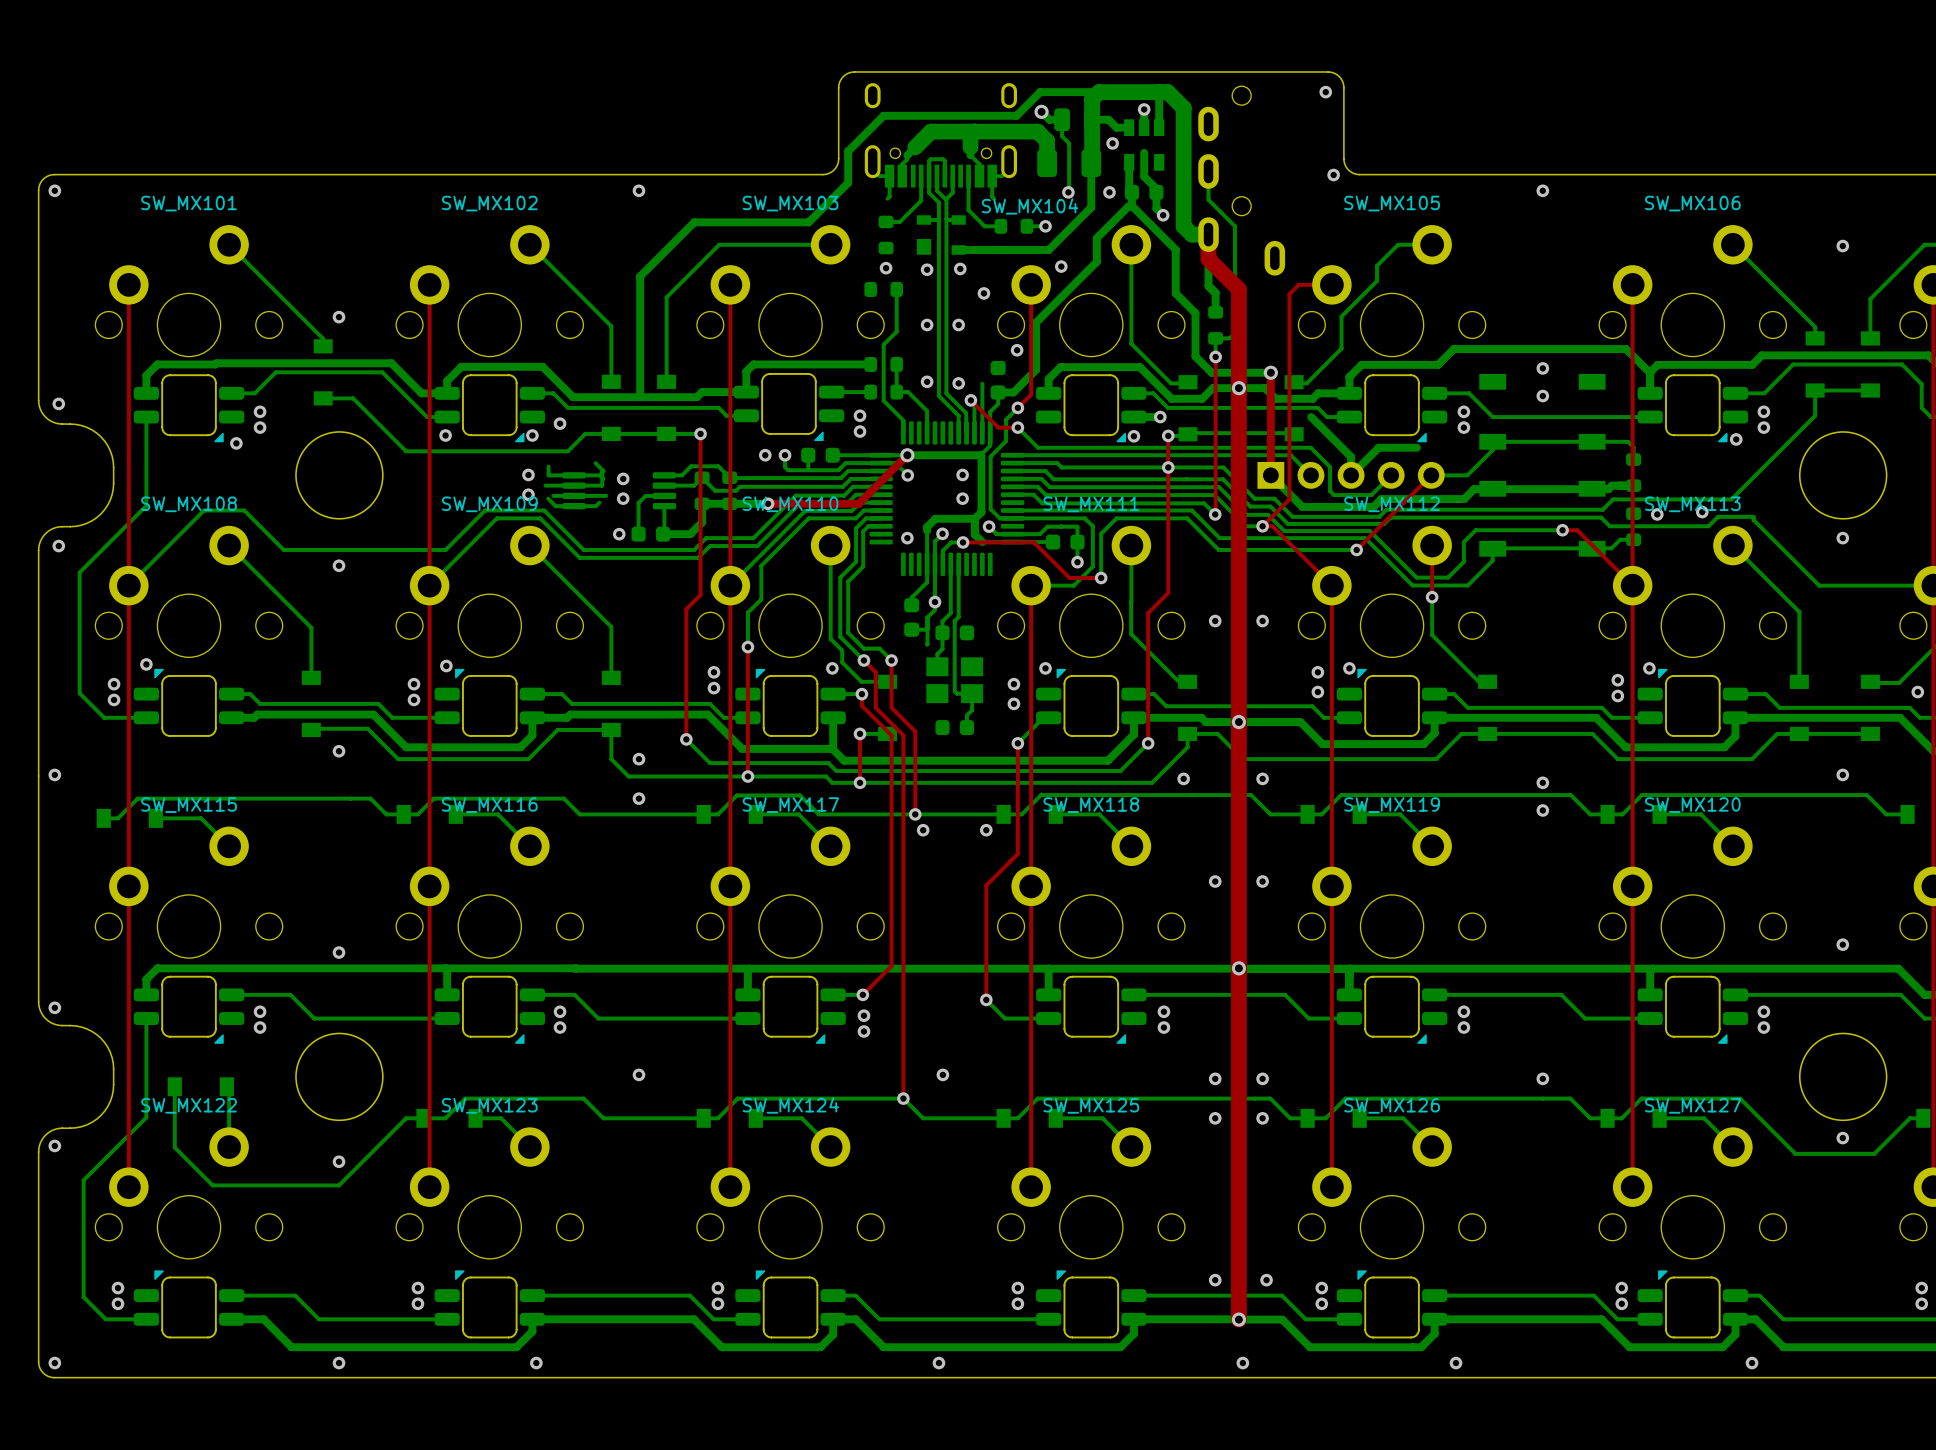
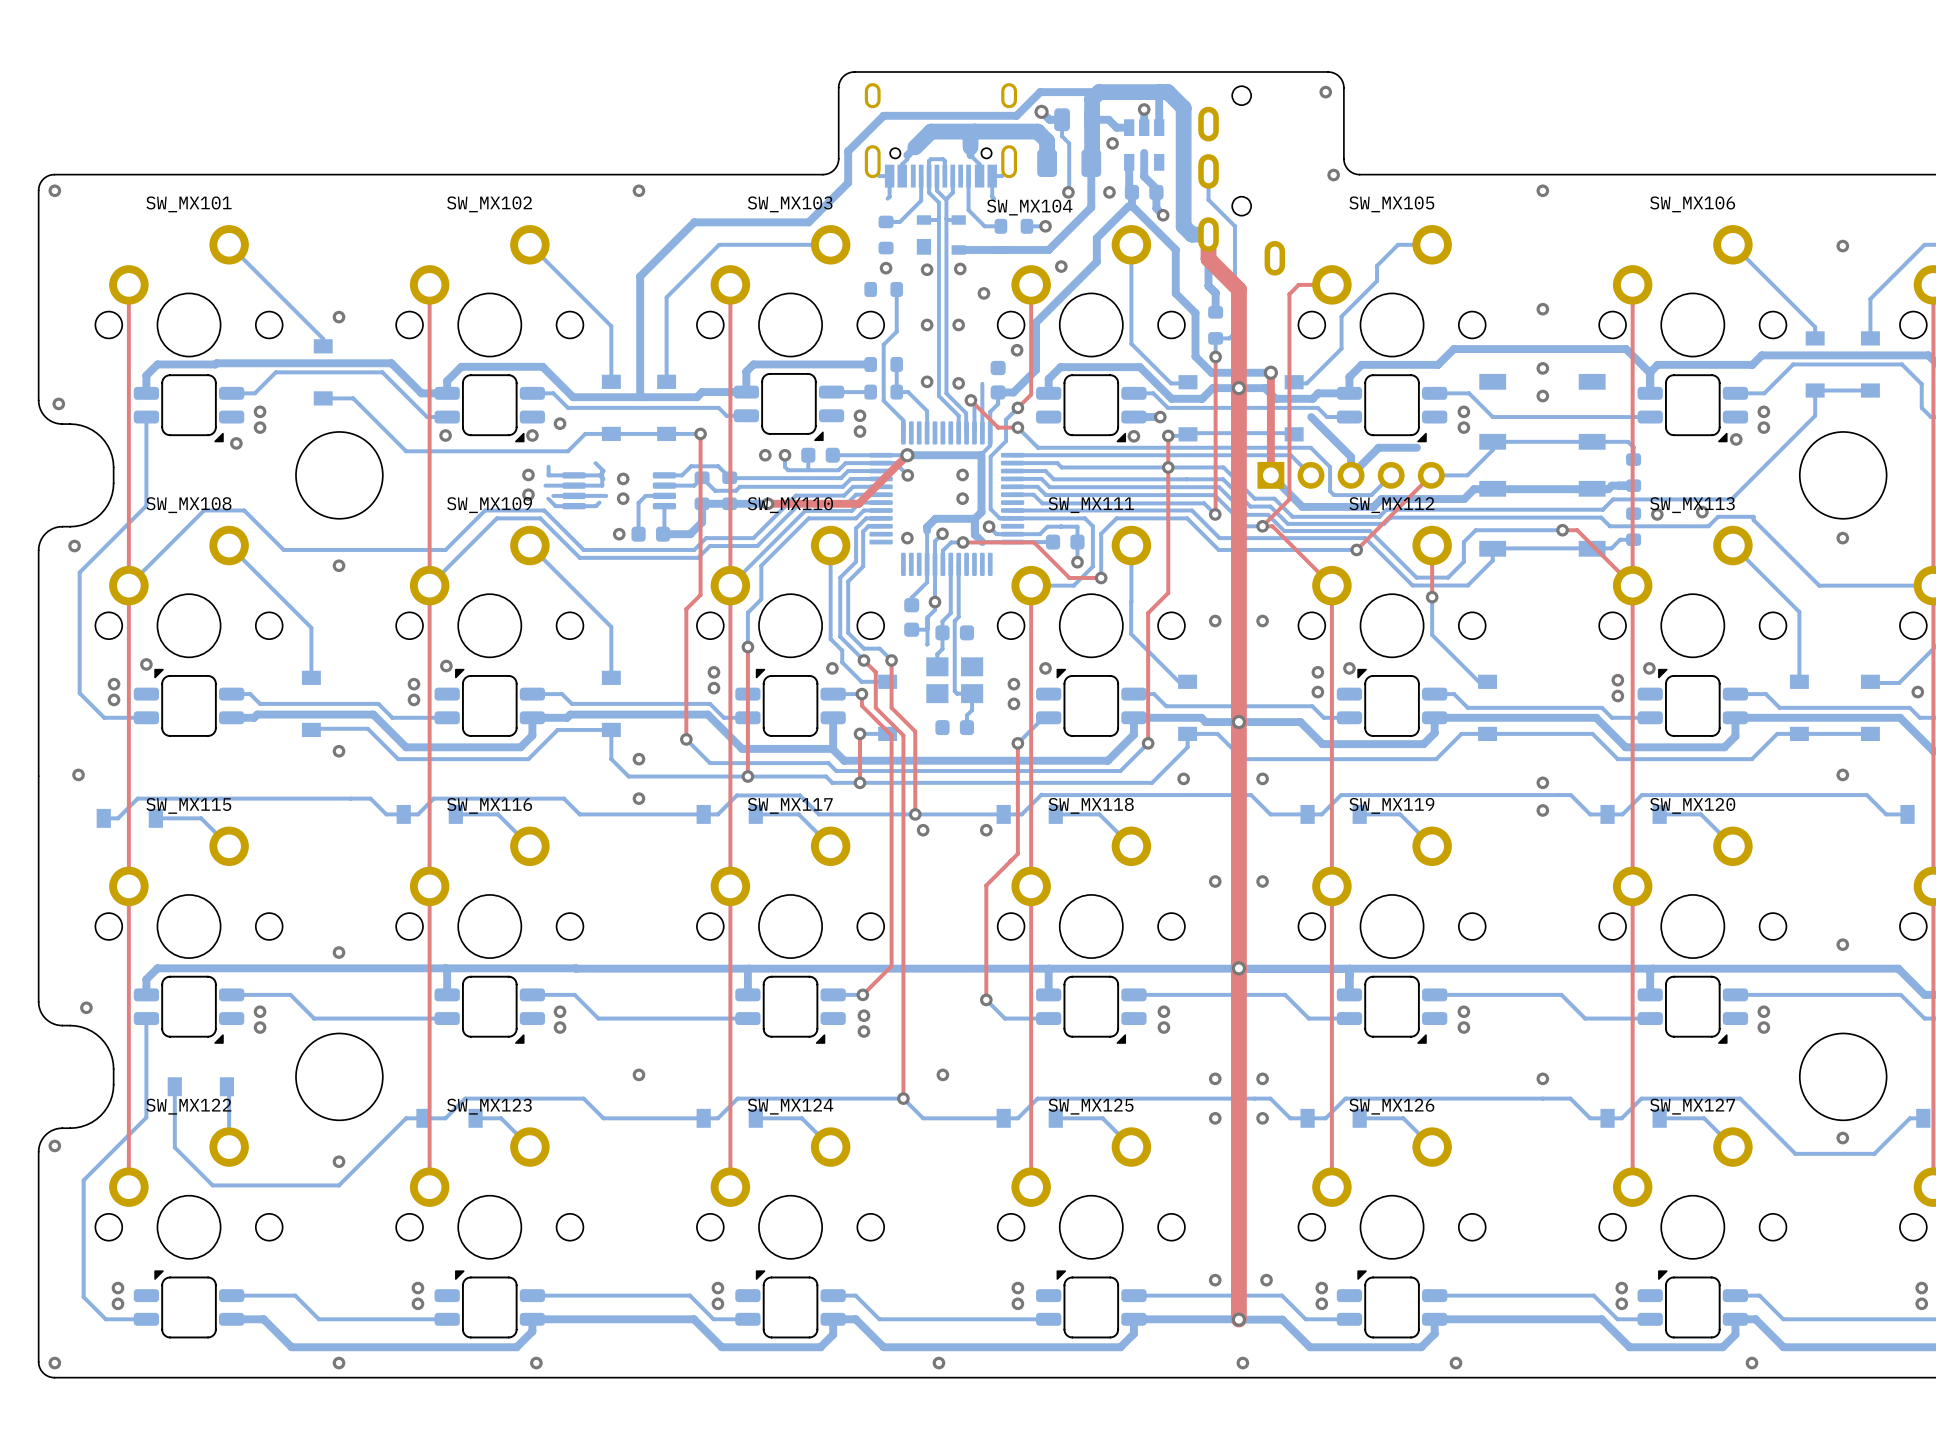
via: none -> (1542, 309)
via position: (58, 546) -> (74, 546)
via position: (54, 774) -> (78, 774)
via position: (54, 1007) -> (86, 1007)

